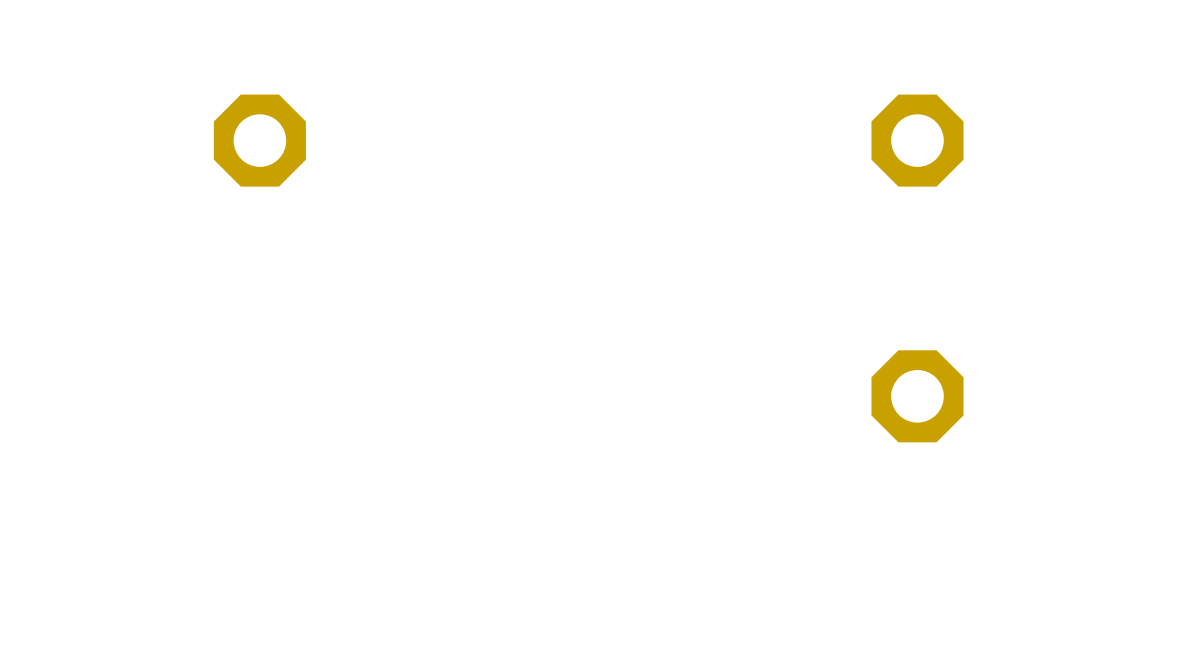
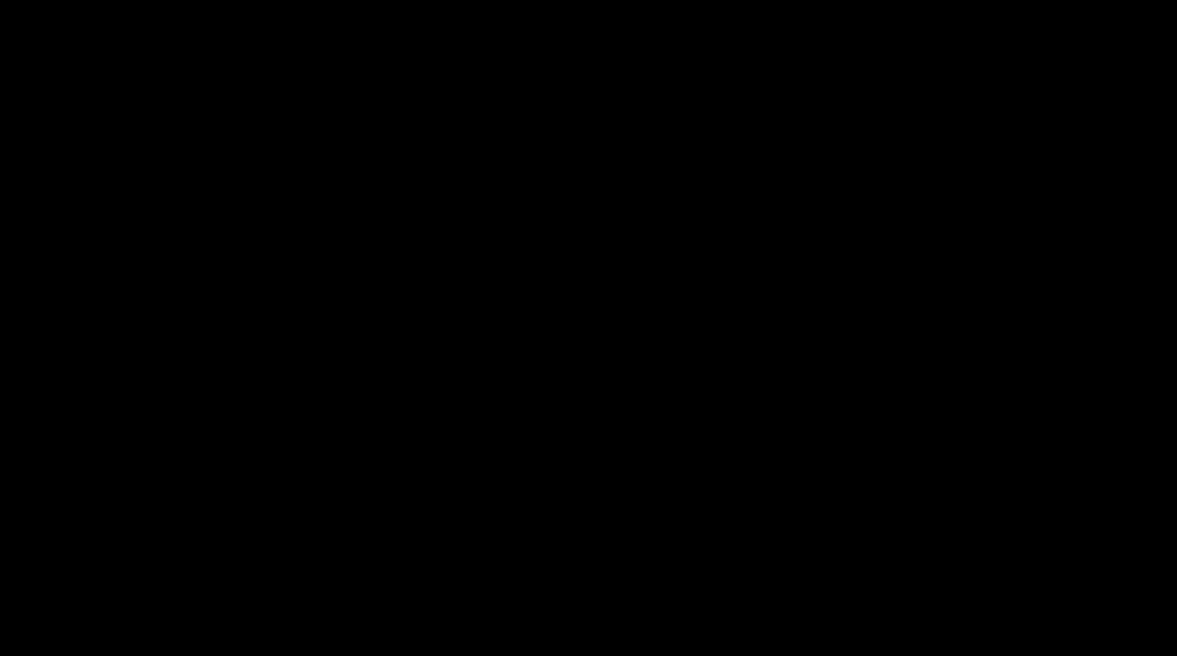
part: (259, 140) -> none
part: (917, 140) -> none
part: (917, 396) -> none

